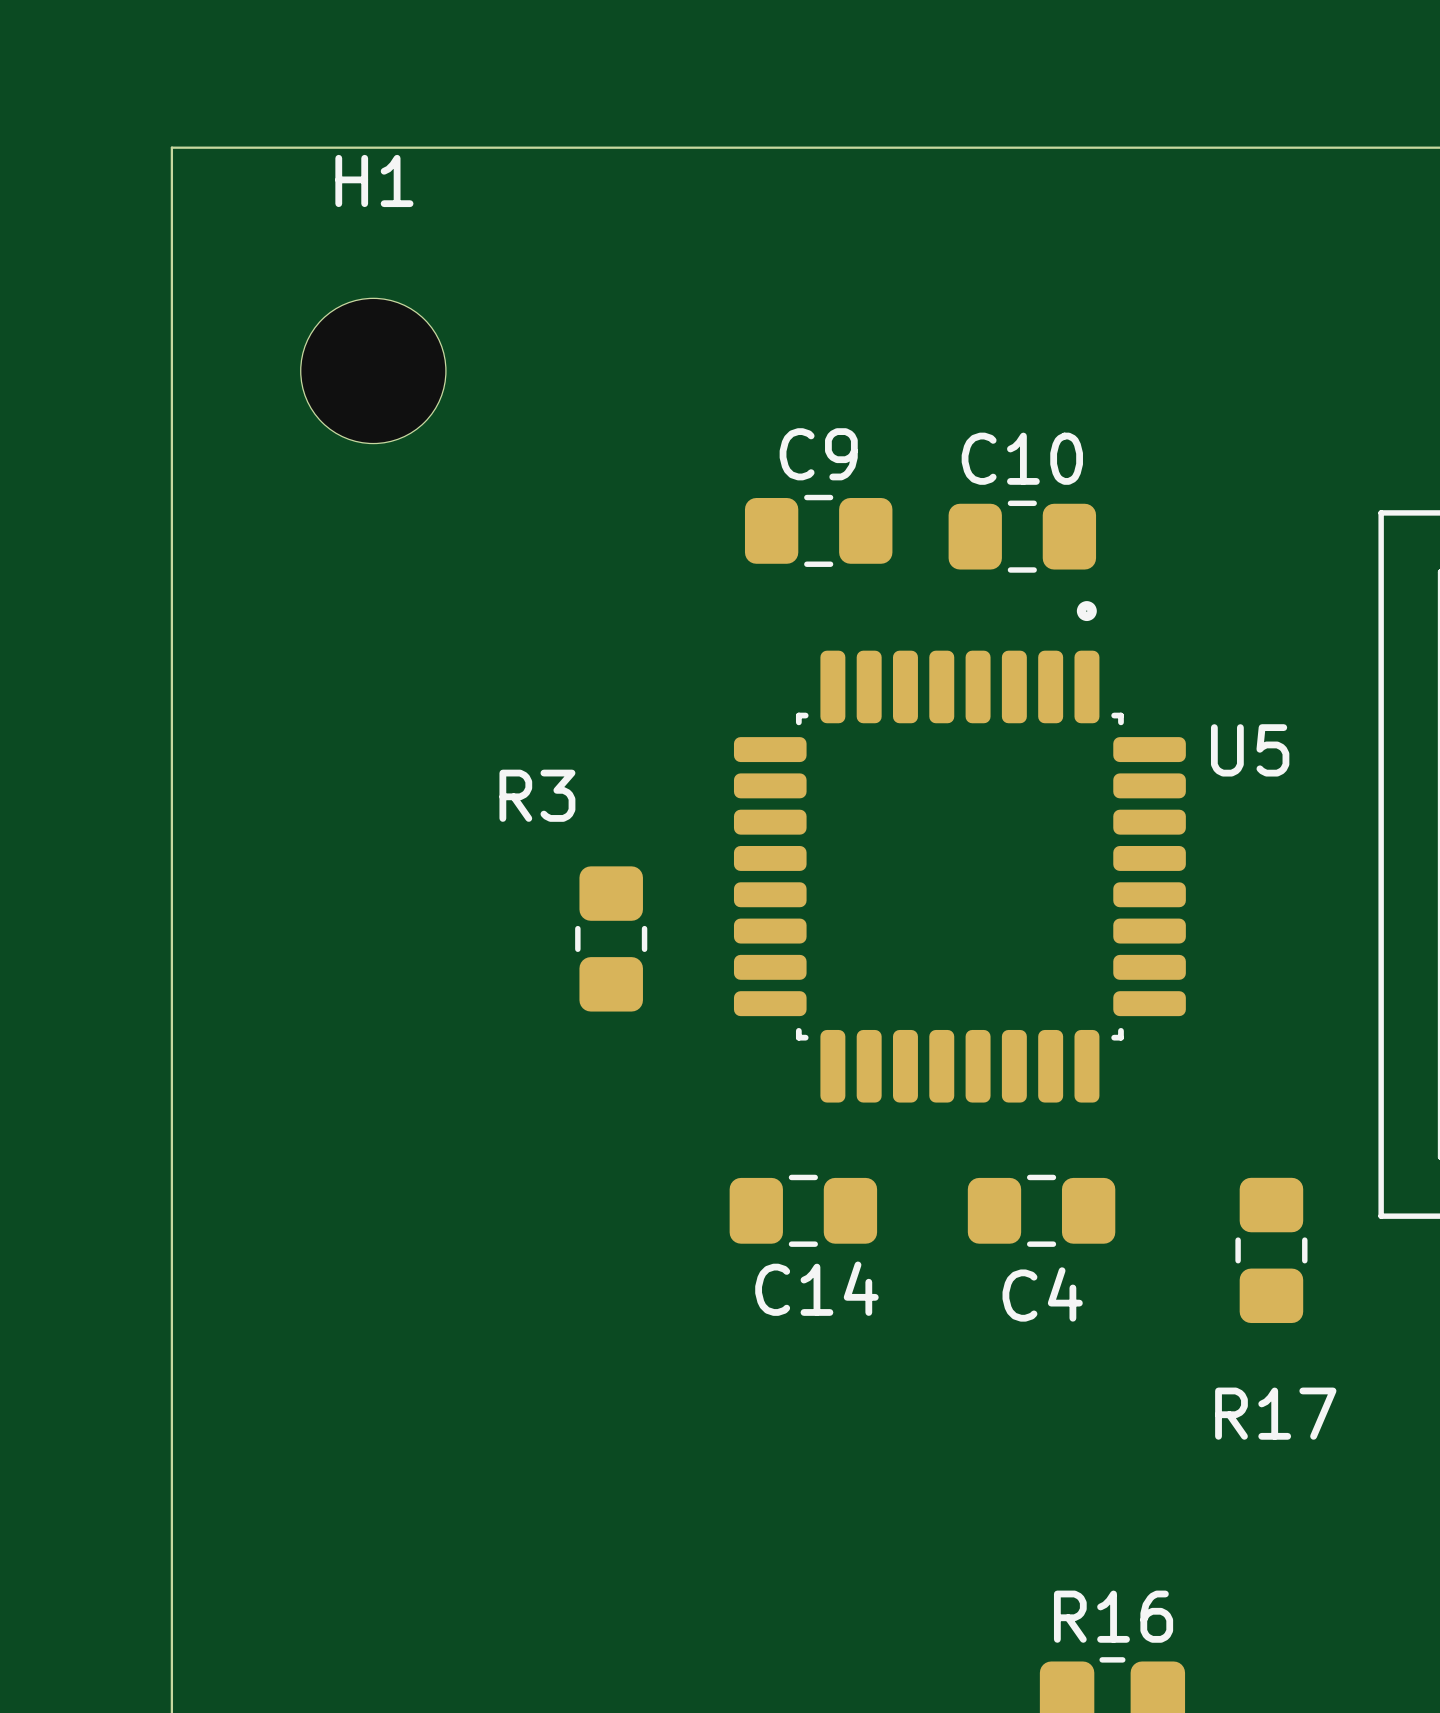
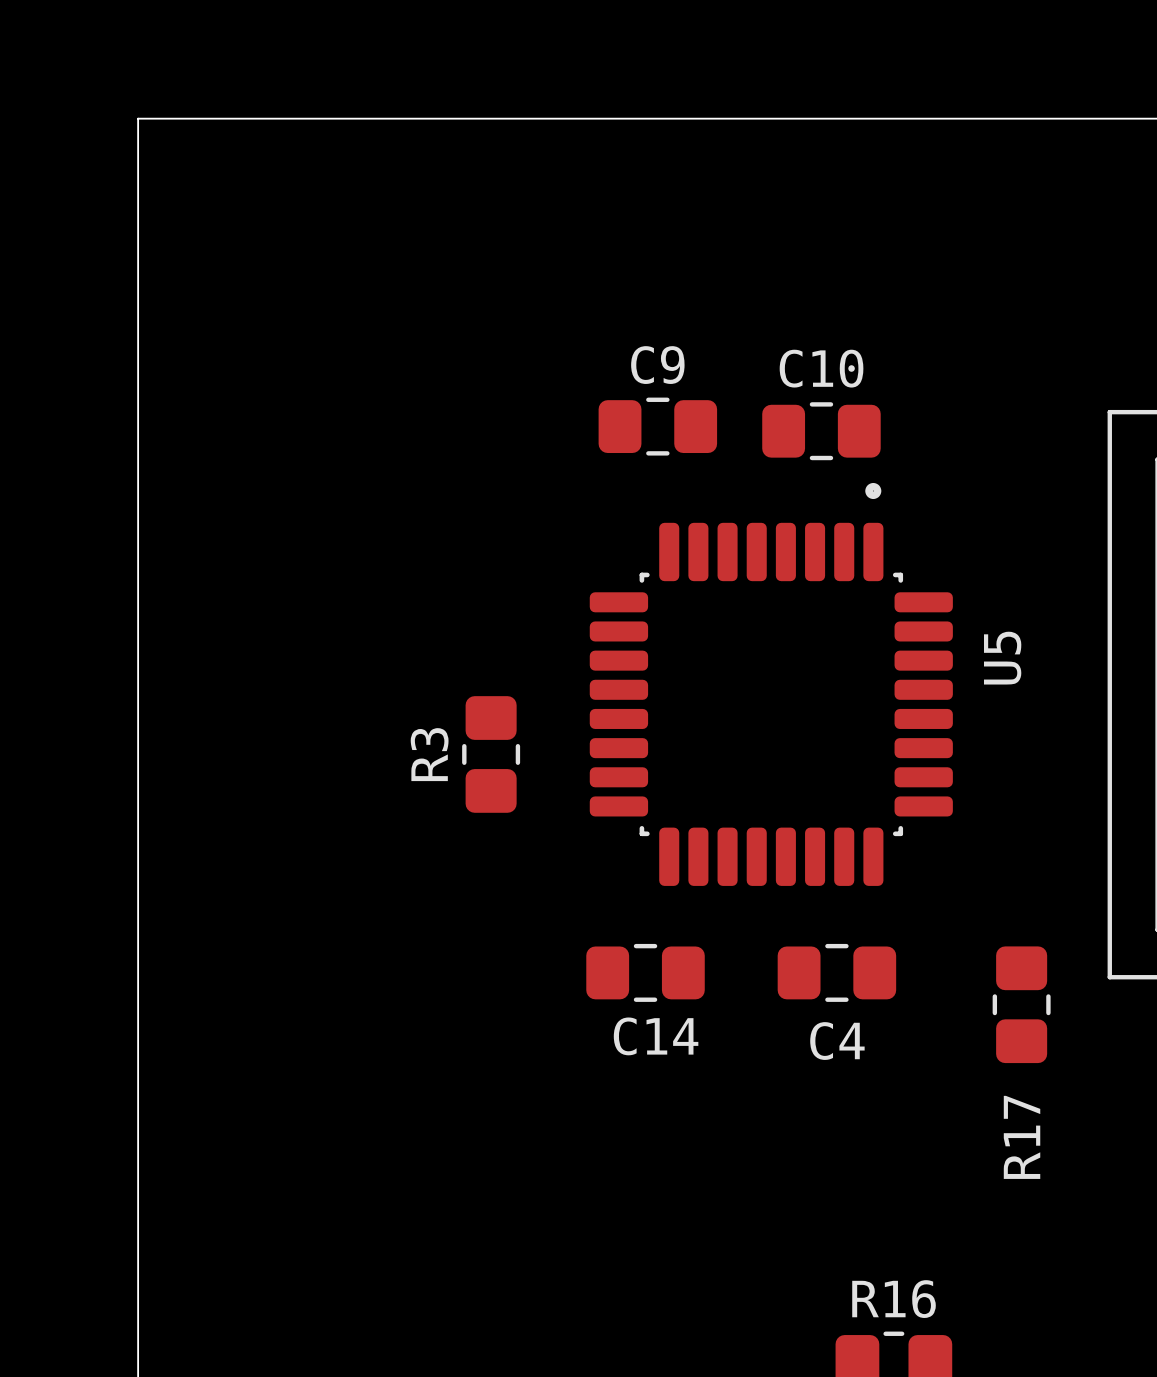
H1: (373, 370) -> none
U5 name rotation: 0° (1250, 750) -> 90° counterclockwise (1002, 658)
R3 name rotation: 0° (537, 795) -> 90° counterclockwise (429, 754)
R3 name position: R3 (537, 795) -> R3 (429, 754)
R17 name rotation: 0° (1275, 1413) -> 90° counterclockwise (1022, 1137)

